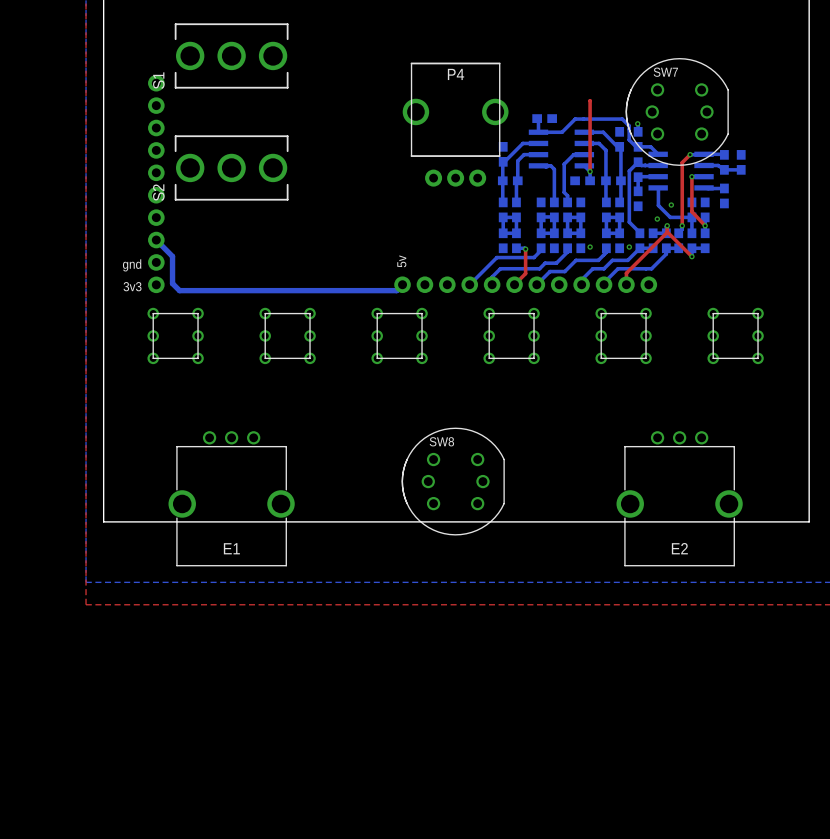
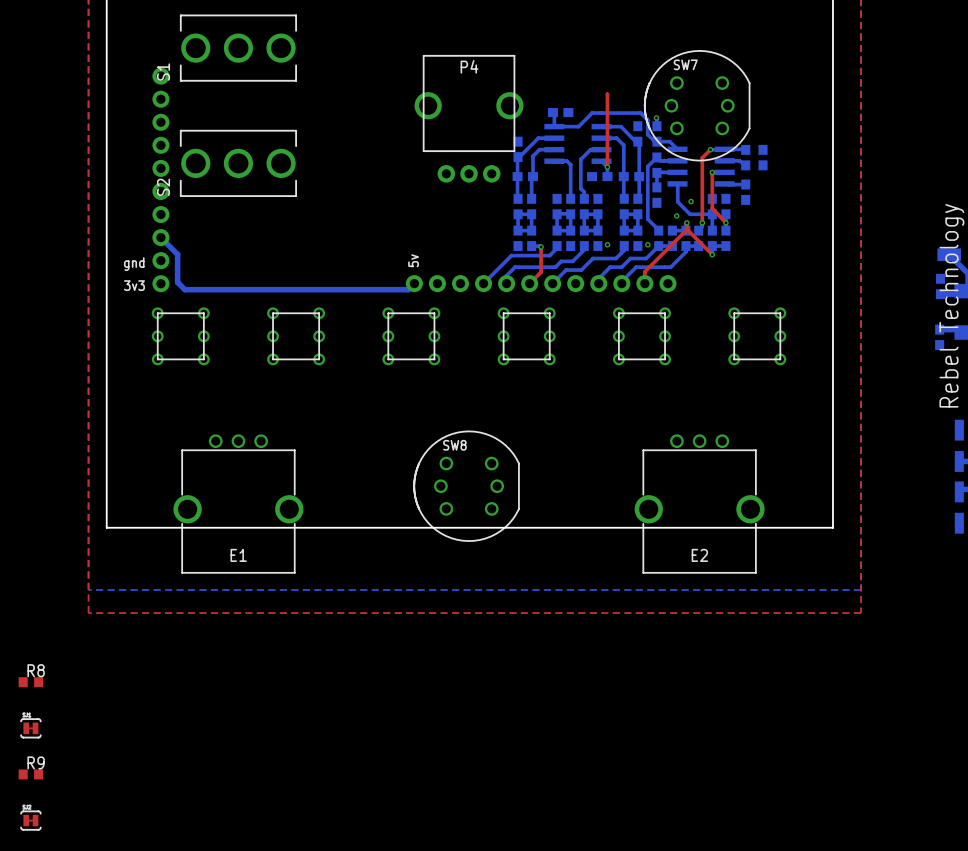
bottom track: (724, 169) (741, 169) -> none
R8: none -> (30, 682)
part: none -> (30, 728)
R9: none -> (30, 774)
part: none -> (30, 820)

